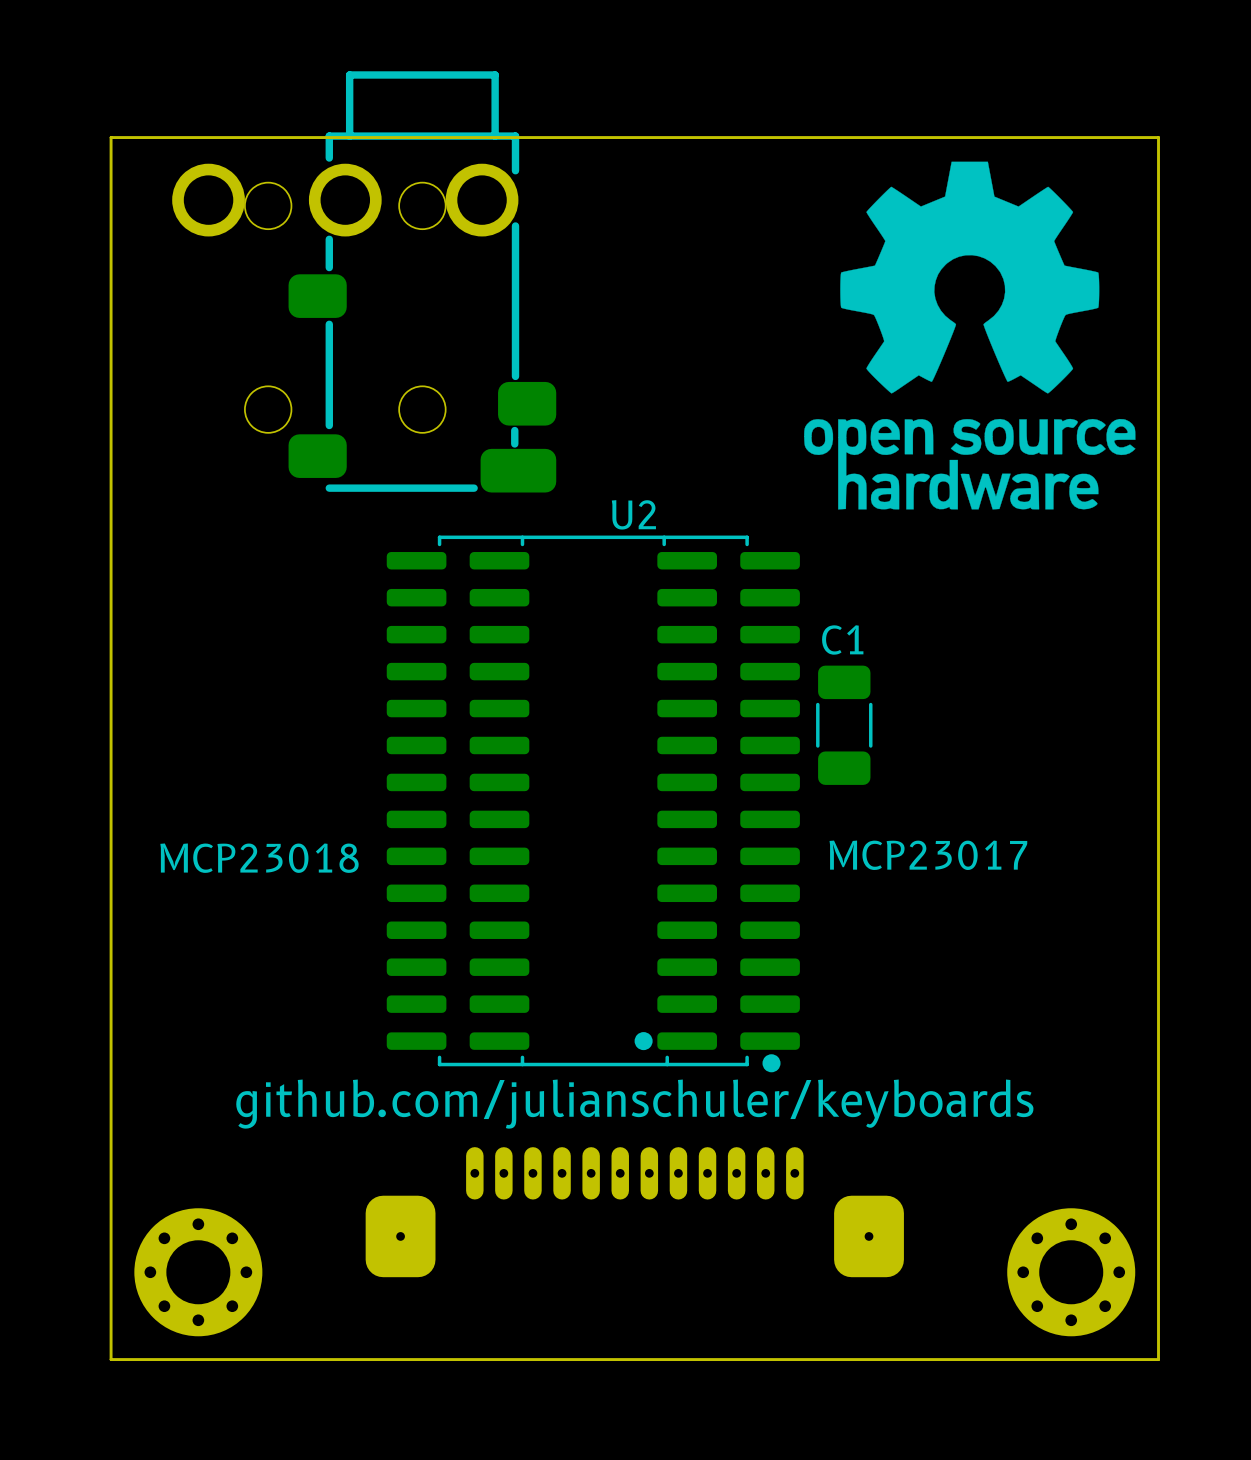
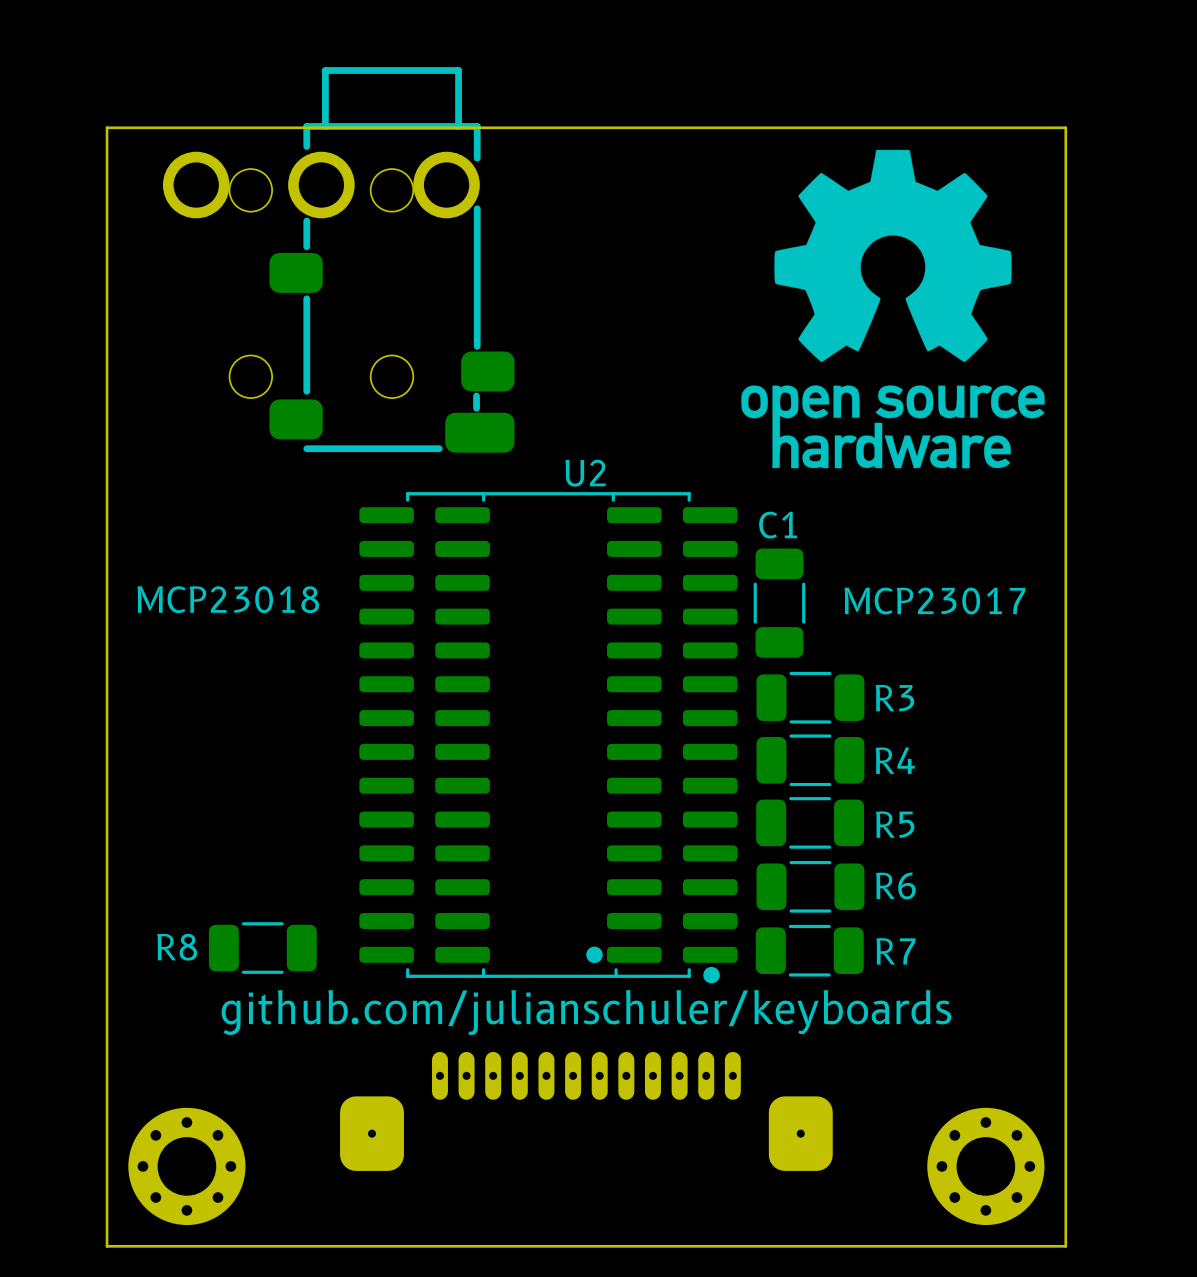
C1 position: (844, 725) -> (779, 603)
R3: none -> (810, 697)
R4: none -> (810, 760)
U2 text position: MCP23017 (928, 855) -> MCP23017 (935, 600)
U2 text position: MCP23018 (259, 858) -> MCP23018 (228, 599)
R5: none -> (810, 822)
R6: none -> (810, 886)
R8: none -> (262, 948)
R7: none -> (809, 950)

